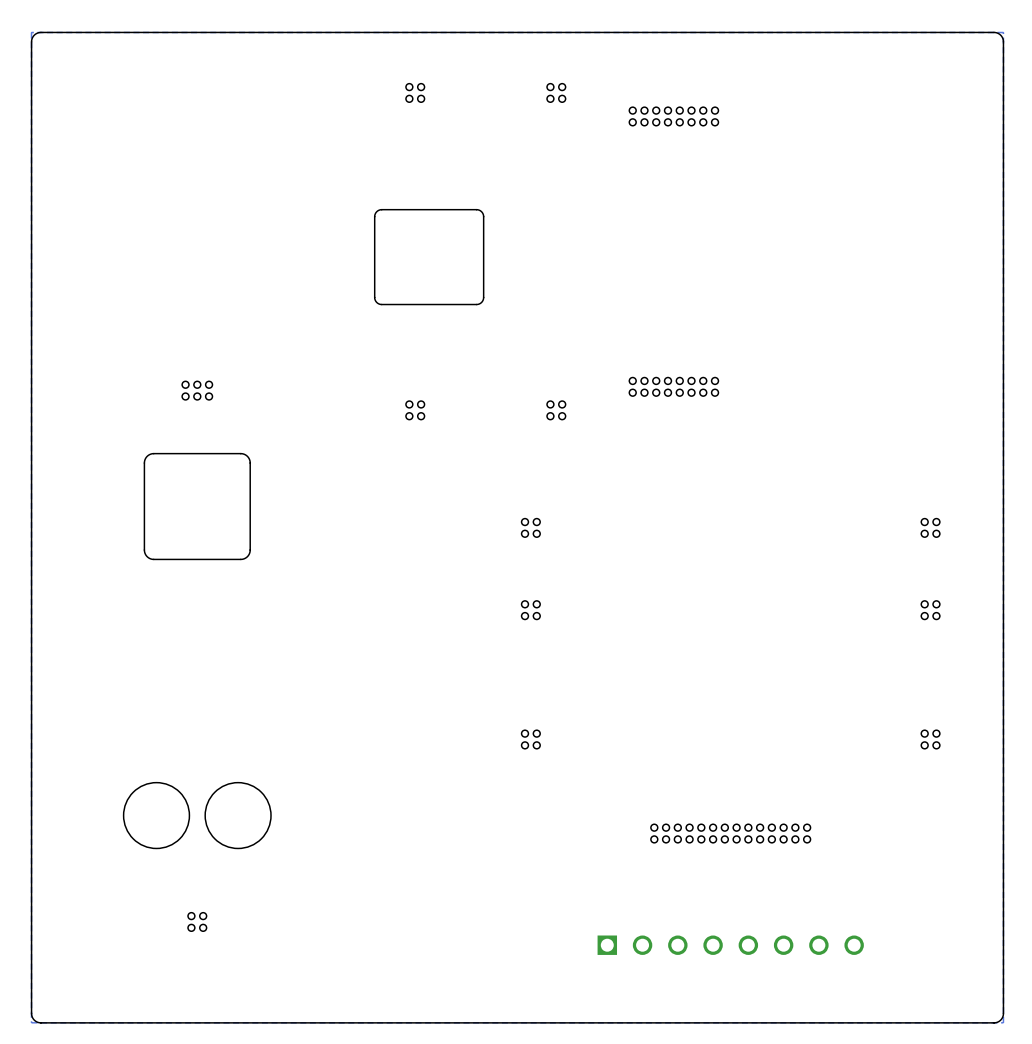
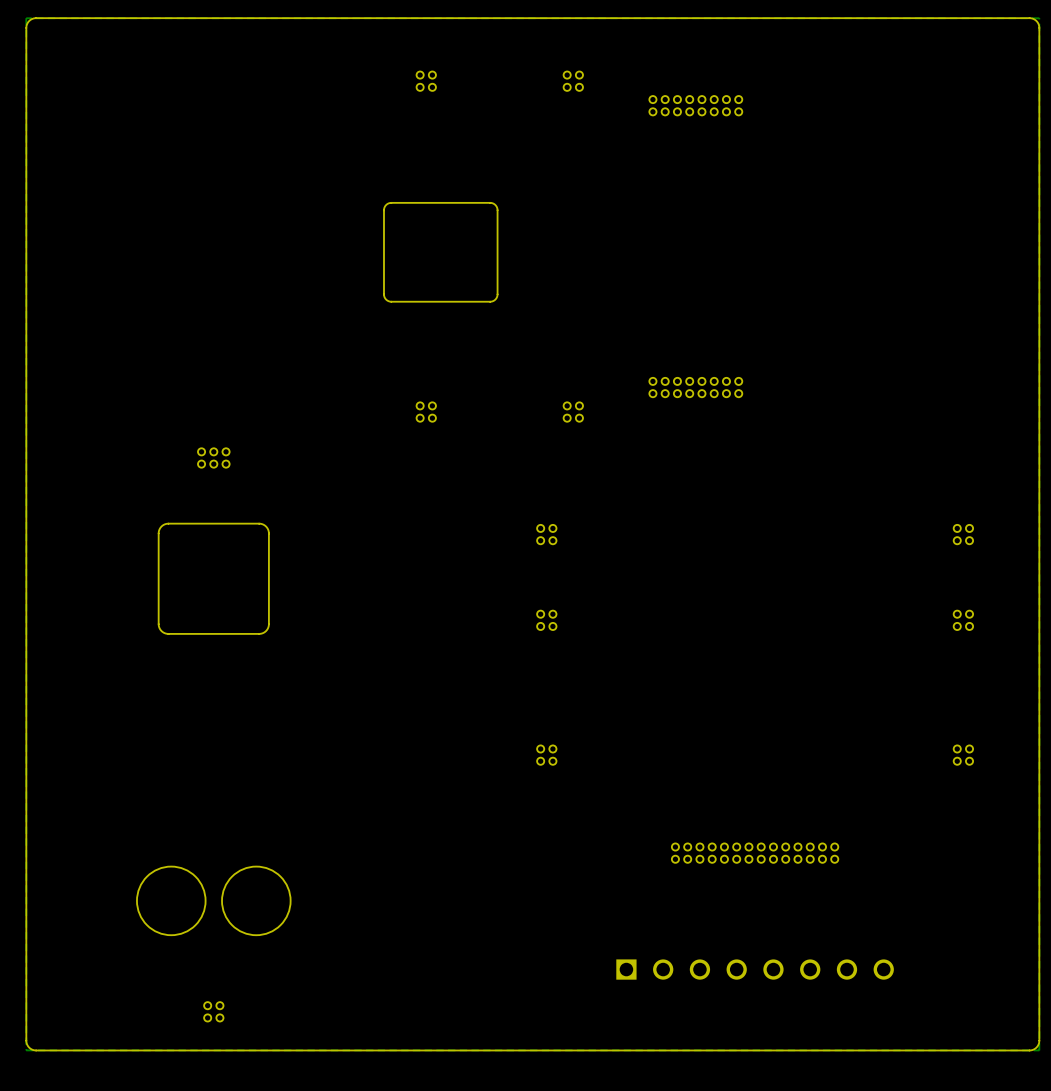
part position: (197, 390) -> (213, 457)
drawing position: (197, 651) -> (213, 729)
part position: (197, 921) -> (213, 1011)

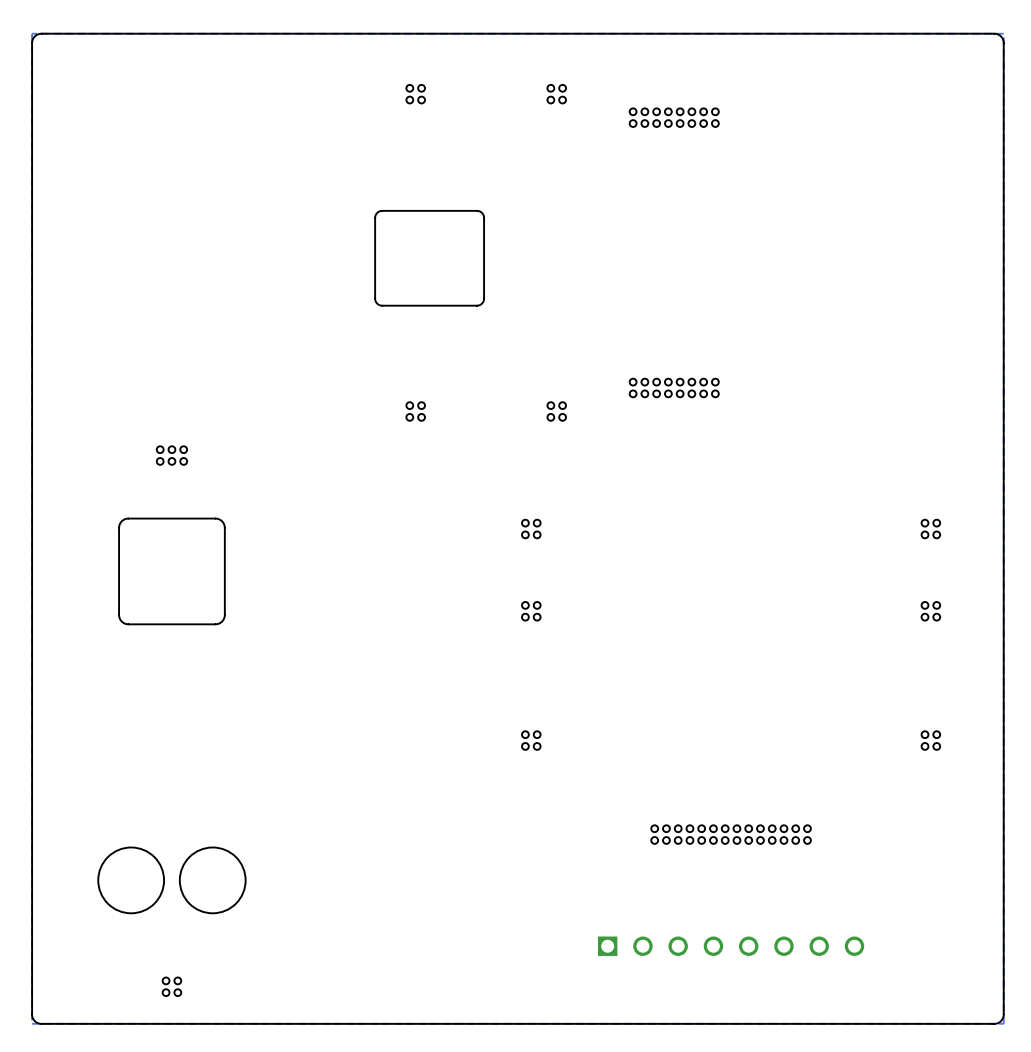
part position: (213, 457) -> (171, 455)
drawing position: (213, 729) -> (171, 715)
part position: (213, 1011) -> (171, 986)

